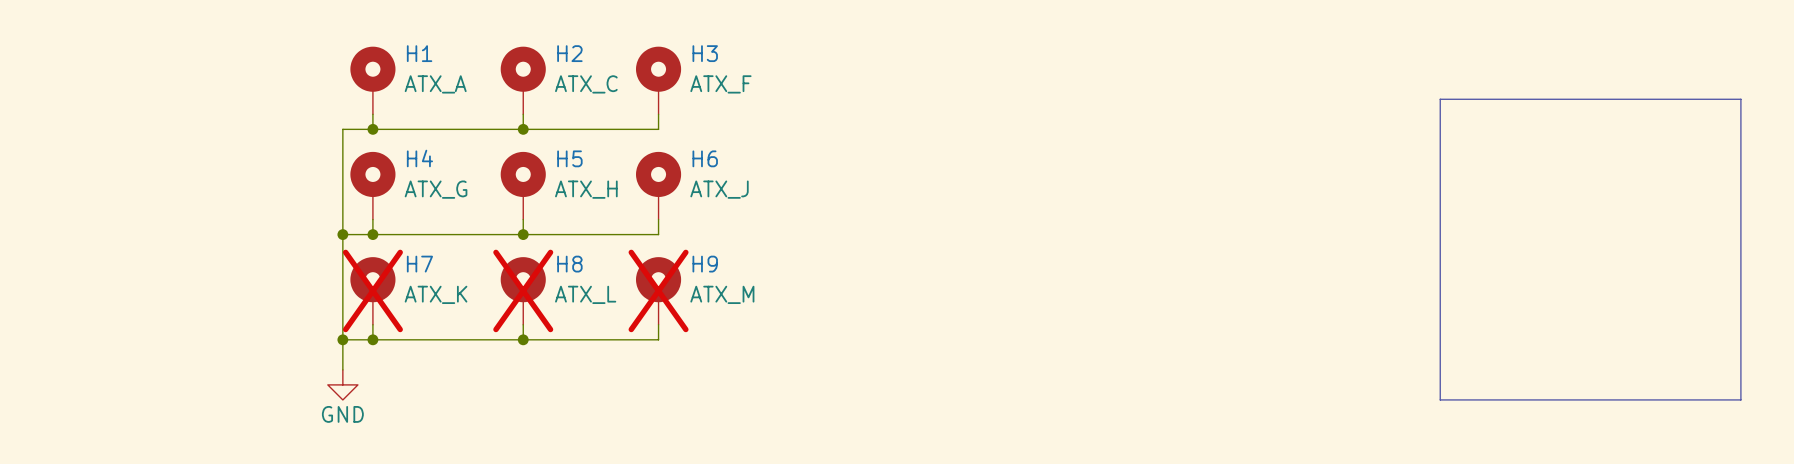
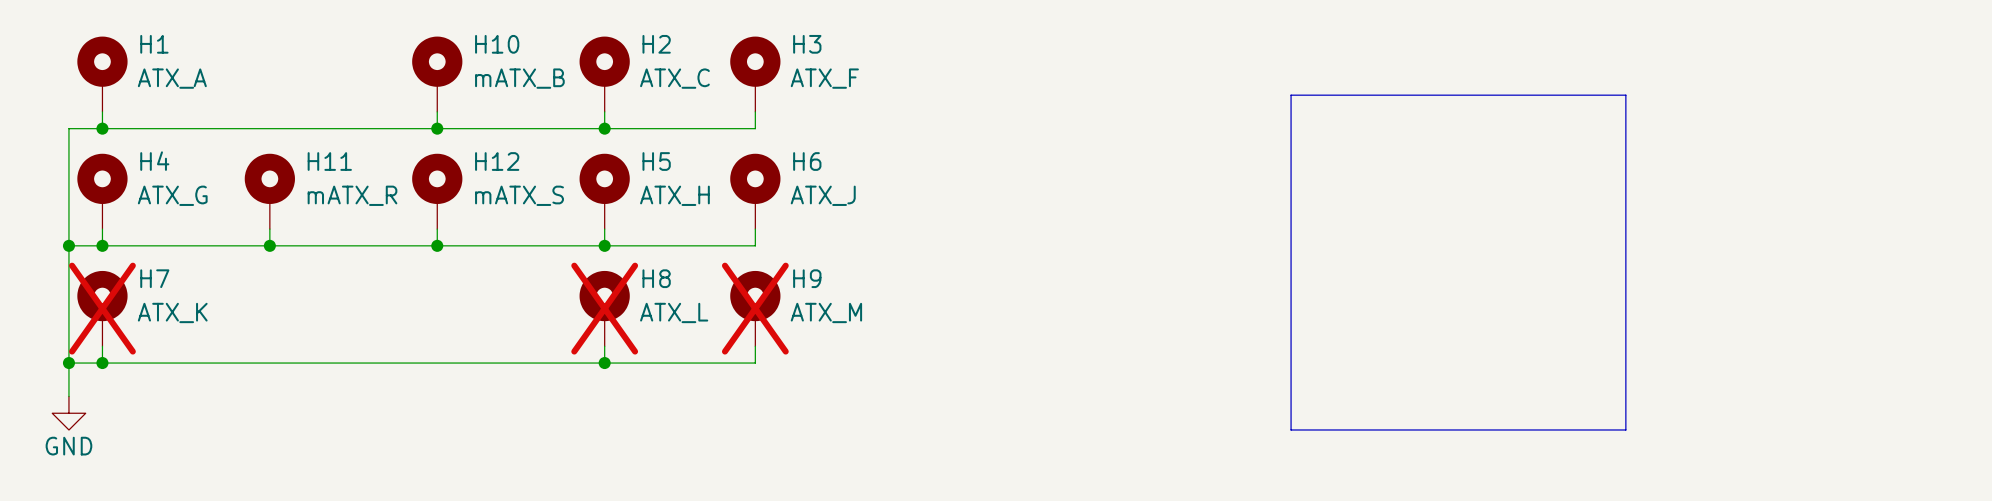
H1 name: H1 (419, 53) -> H10 (497, 44)
H1: none -> ATX_A (102, 74)
H1 value: ATX_A (435, 84) -> mATX_B (519, 78)
line: (1440, 99) (1740, 99) (1740, 399) (1440, 399) -> (1625, 95) (1291, 95) (1291, 429) (1625, 429)
wire: none -> (102, 111) (102, 128)
junction: none -> (102, 128)
wire: (342, 129) (342, 369) -> (403, 128) (68, 128) (68, 396)
H4 name: H4 (419, 158) -> H12 (497, 161)
H4: none -> ATX_G (102, 191)
H11: none -> mATX_R (269, 191)
H4 value: ATX_G (436, 189) -> mATX_S (519, 195)
wire: none -> (102, 229) (102, 245)
wire: none -> (68, 245) (403, 245)
junction: none -> (68, 245)
junction: none -> (102, 245)
junction: none -> (269, 245)
junction: (342, 234) -> none
H7 position: (372, 290) -> (102, 308)
wire: none -> (102, 346) (102, 363)
wire: (372, 324) (372, 339) -> (269, 229) (269, 245)
wire: none -> (68, 363) (403, 363)
junction: none -> (68, 363)
junction: none -> (102, 363)
junction: (342, 339) -> none
junction: (372, 339) -> none
power symbol: none -> GND (68, 413)
power symbol: GND (342, 384) -> none

